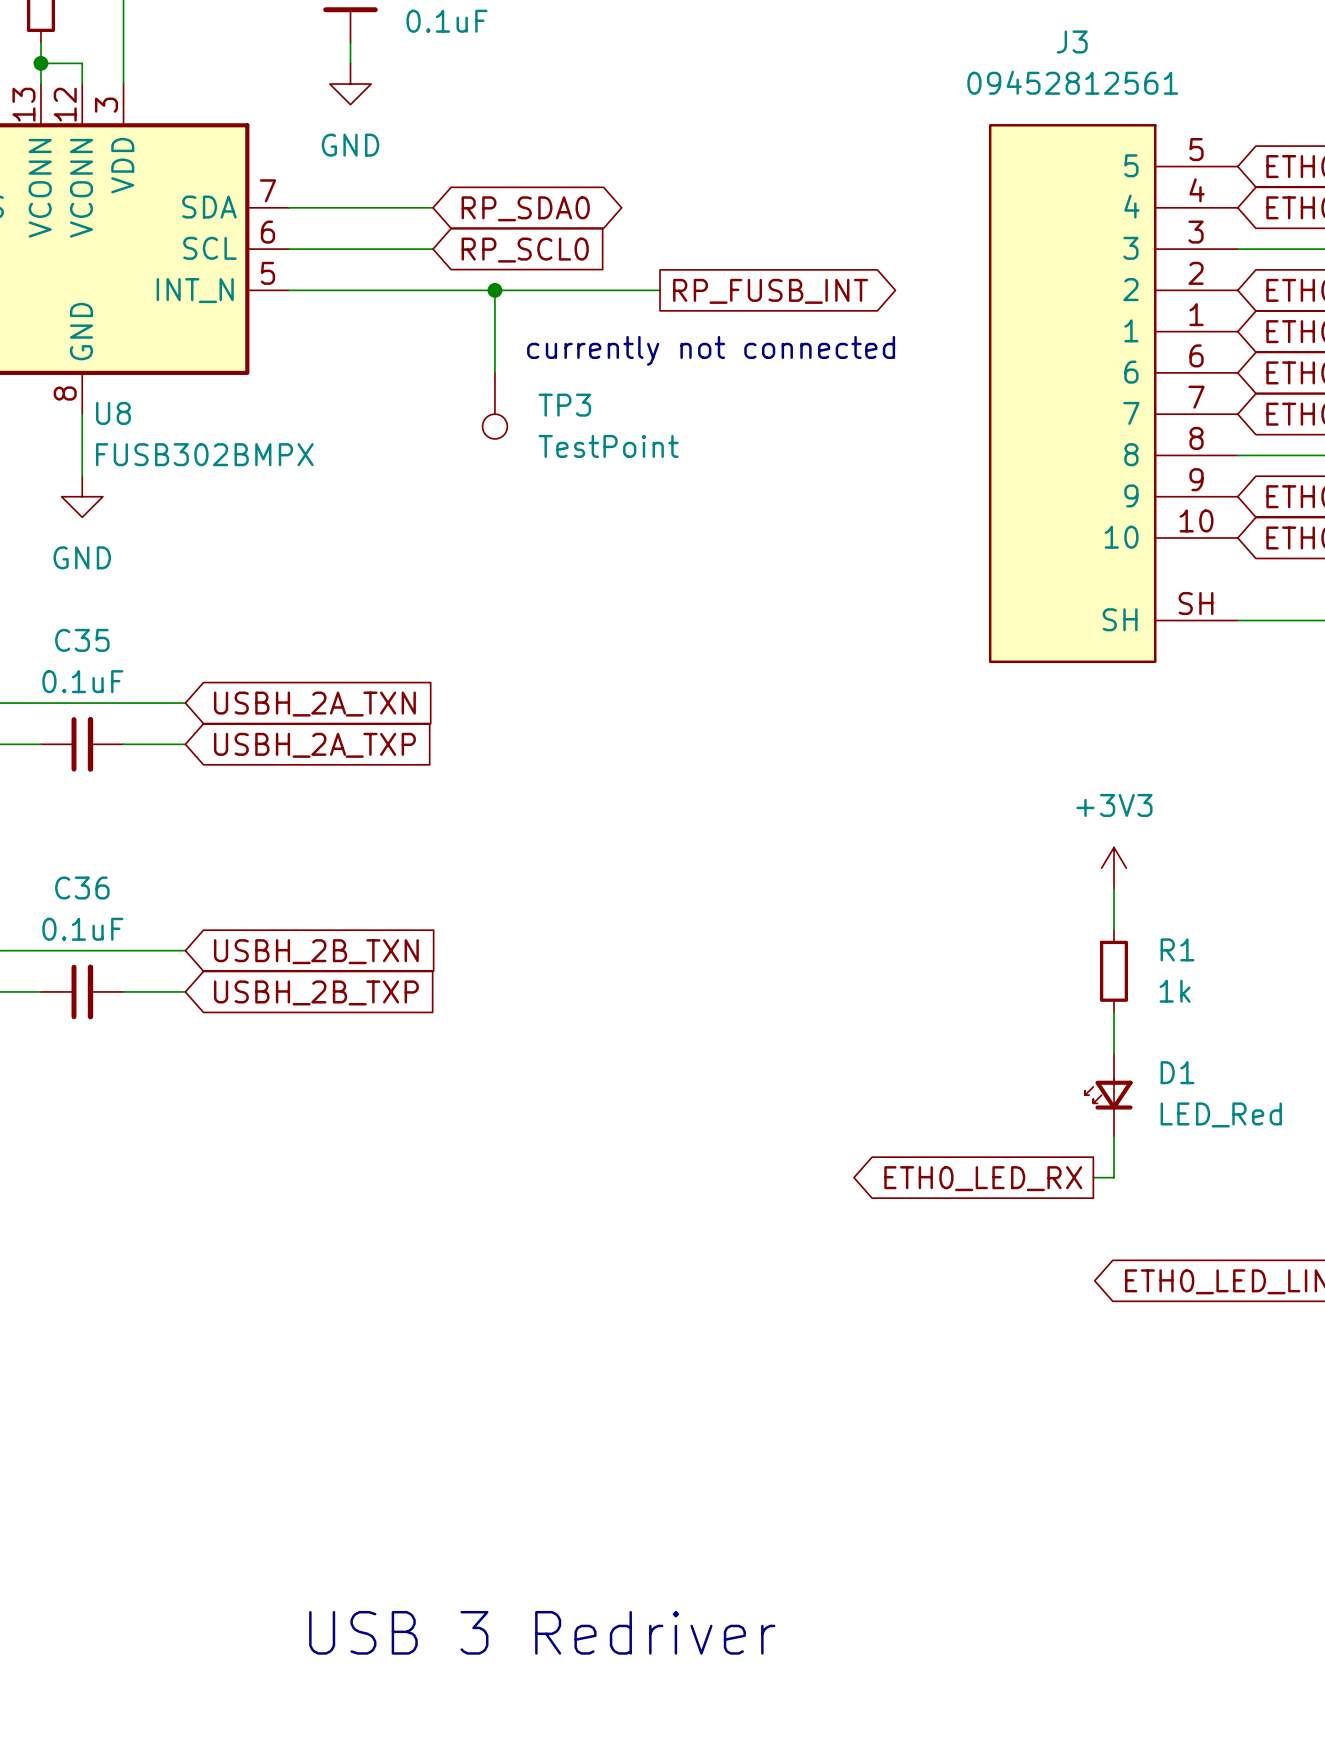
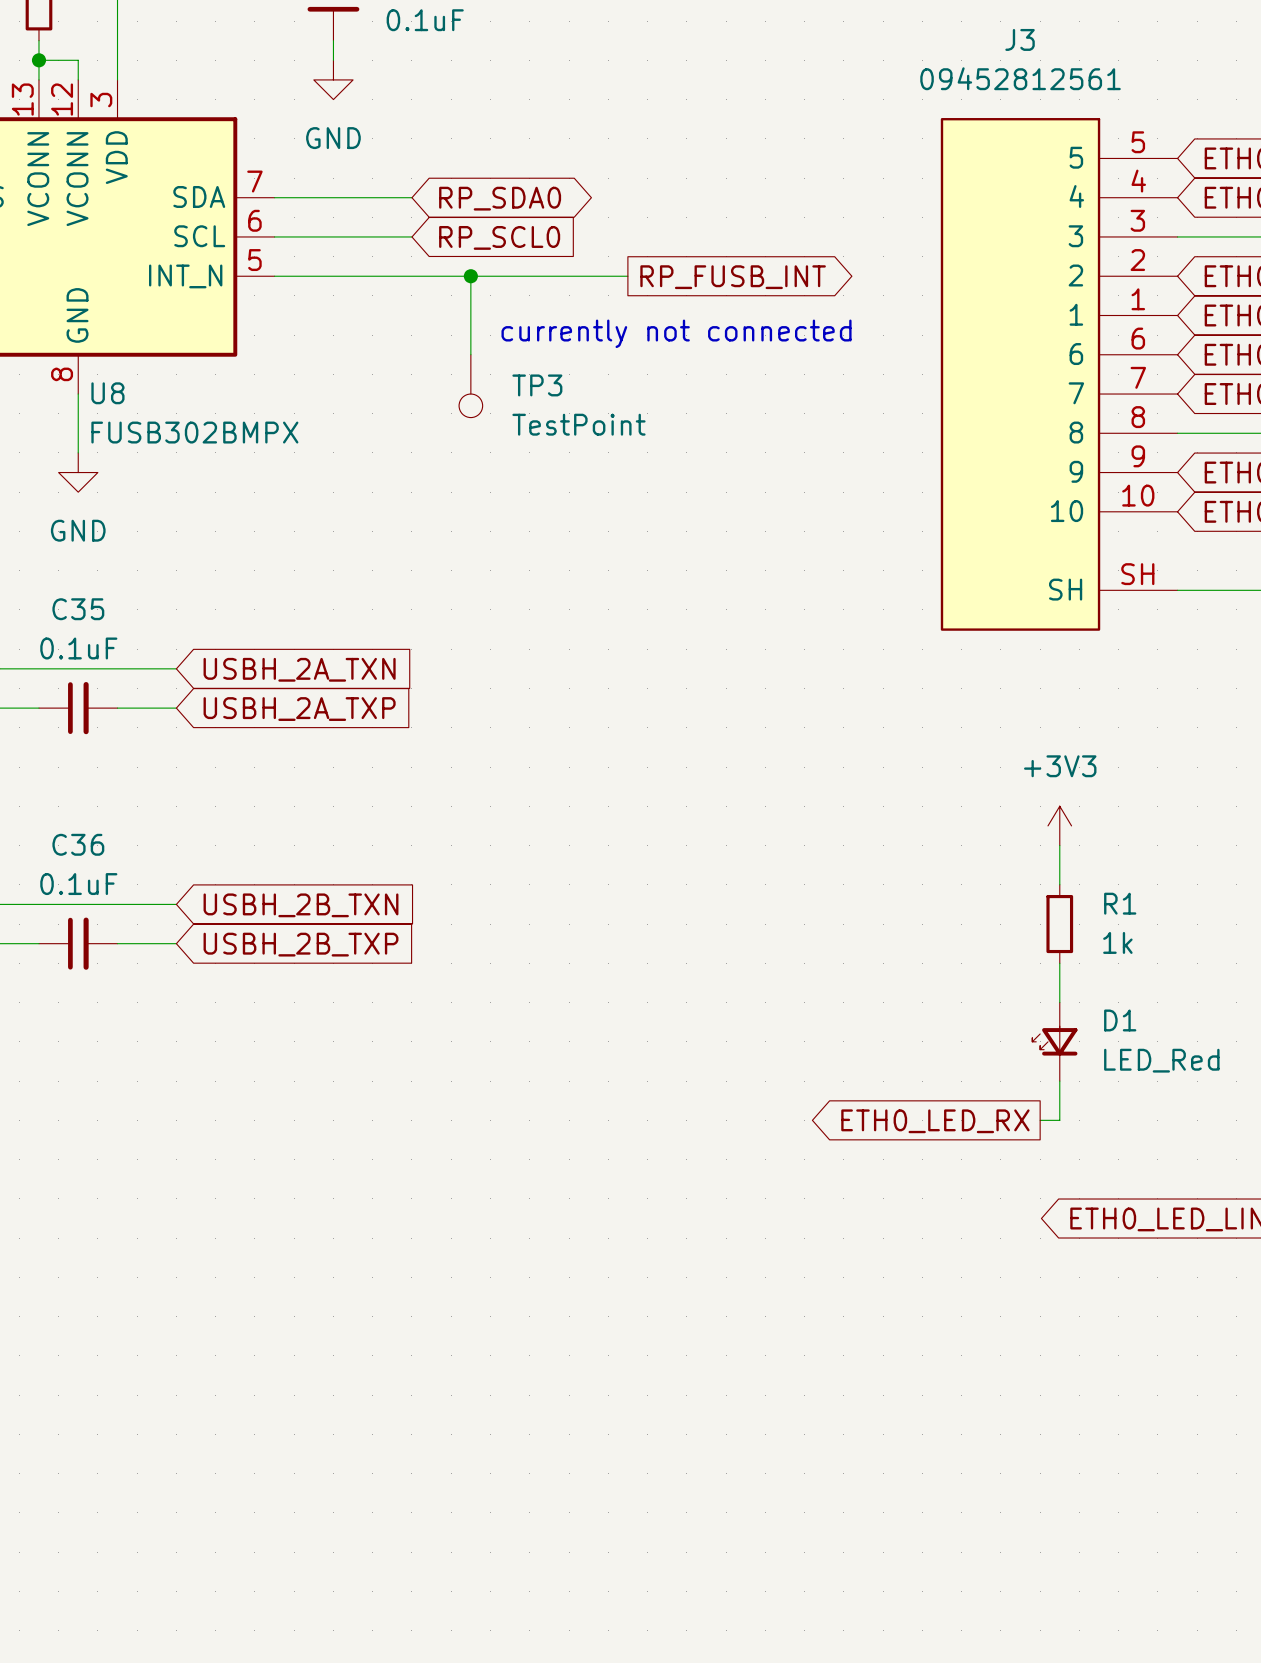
text: USB 3 Redriver (542, 1632) -> none

